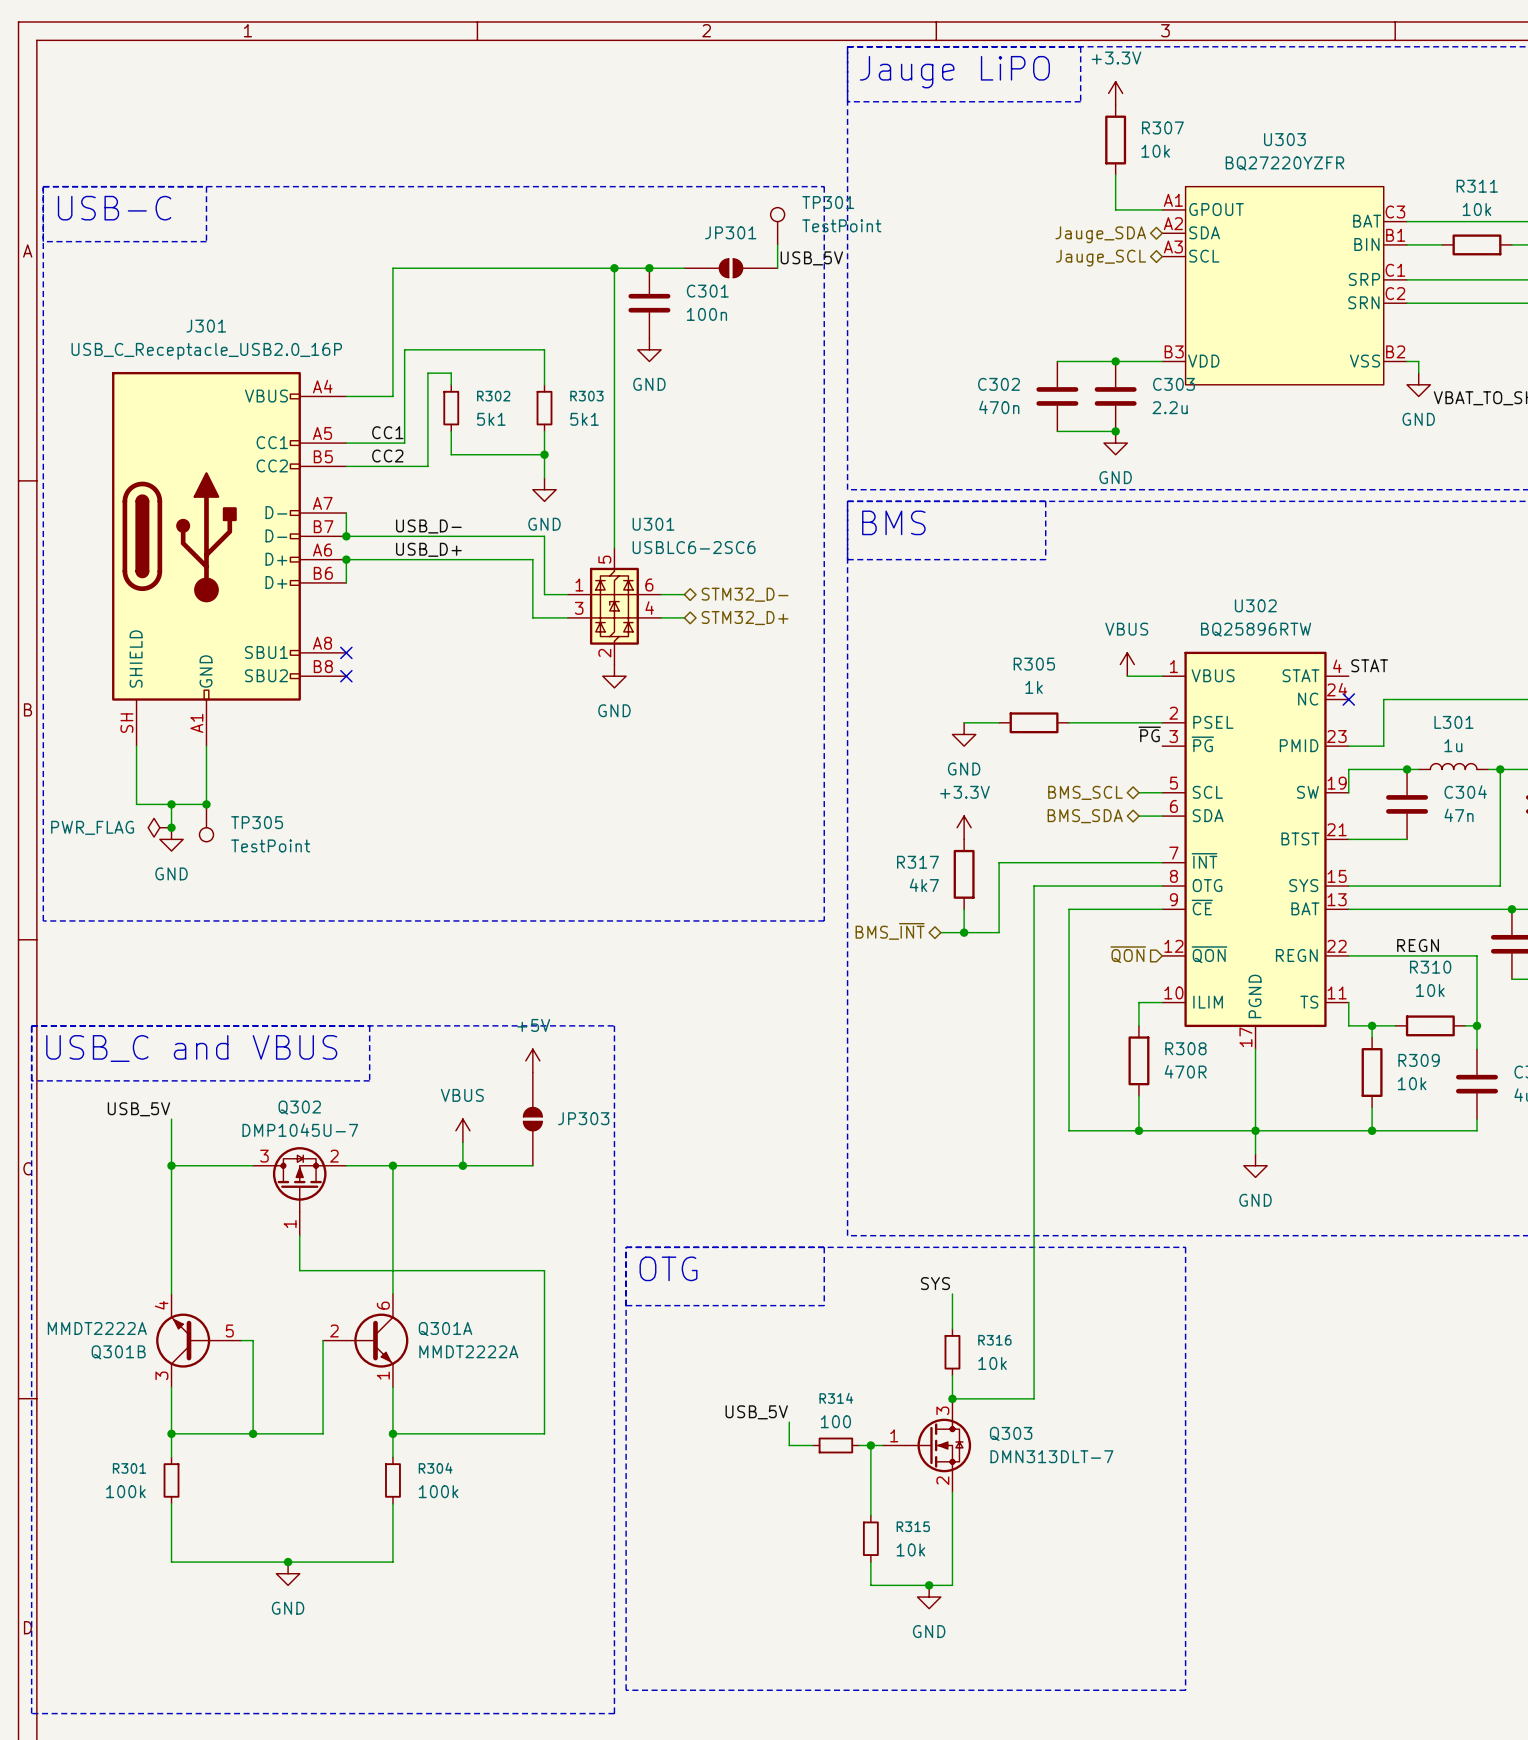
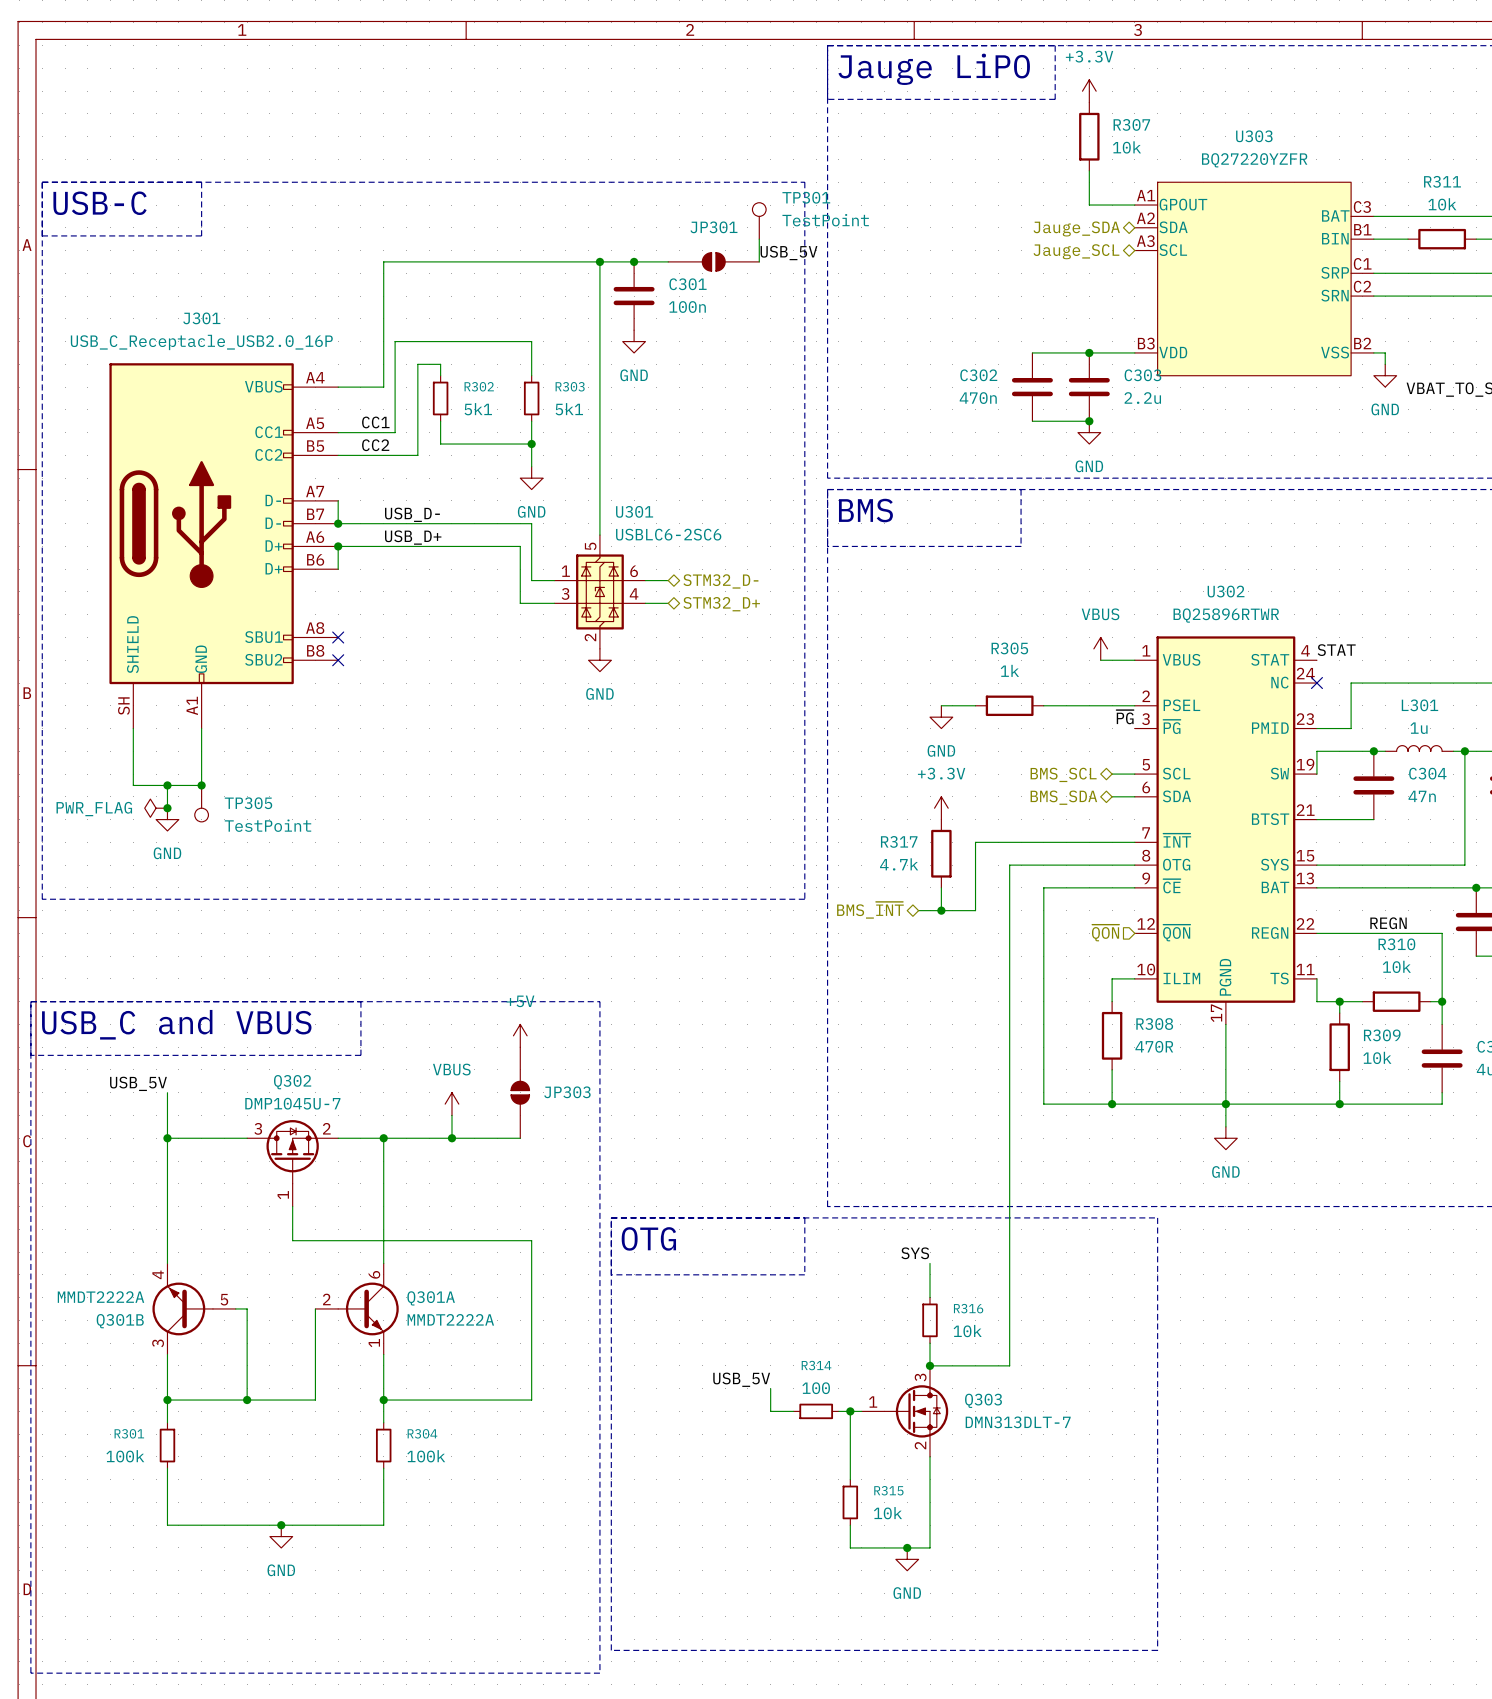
U302 value: BQ25896RTW (1256, 629) -> BQ25896RTWR (1226, 615)
R317 value: 4k7 (924, 885) -> 4.7k (899, 864)

